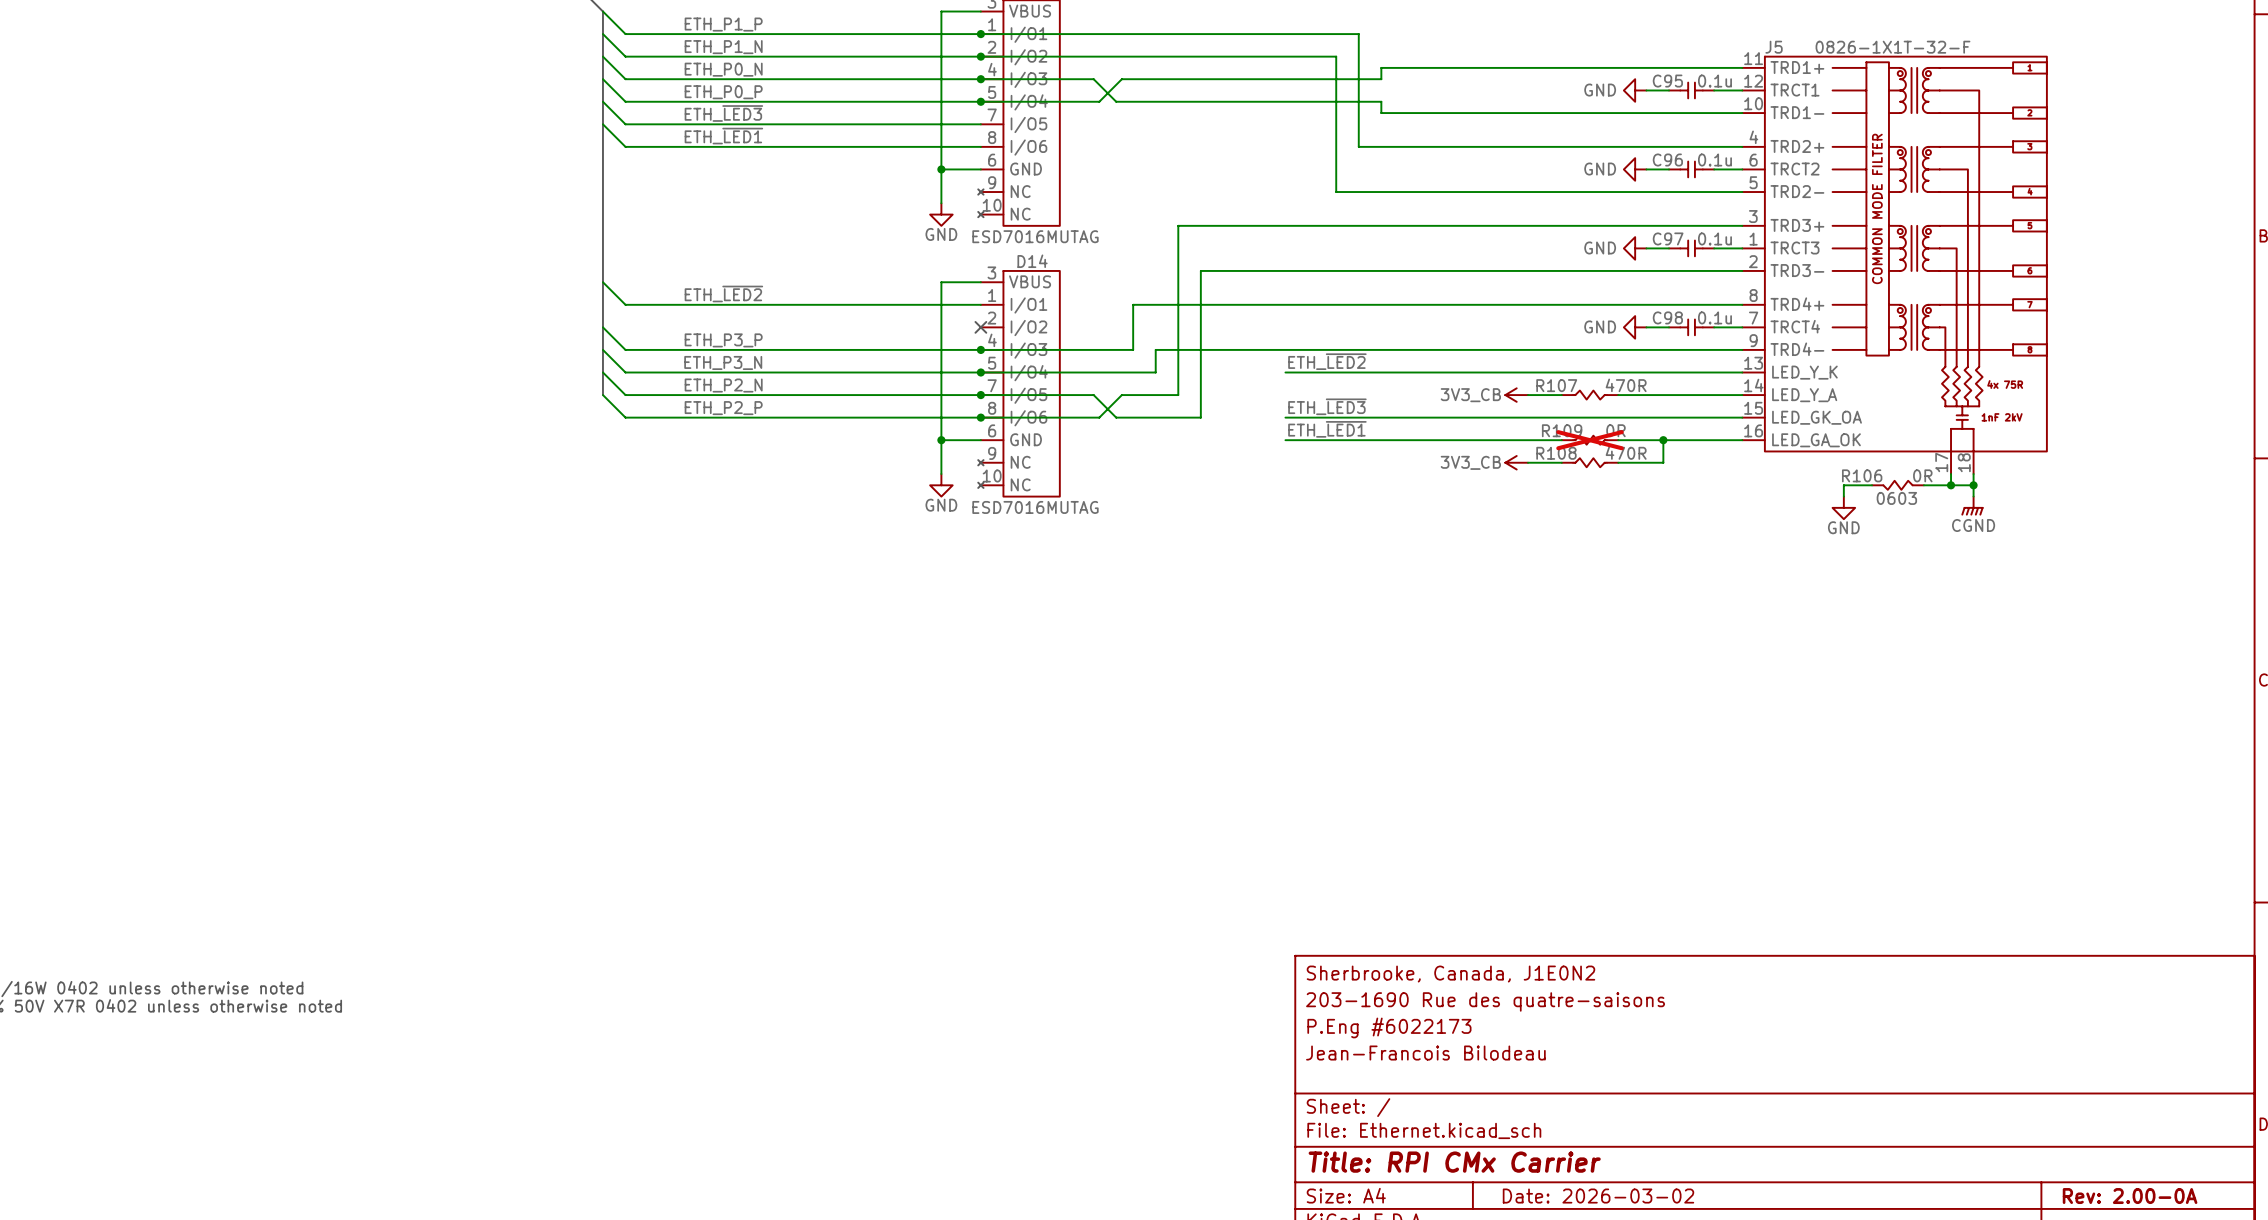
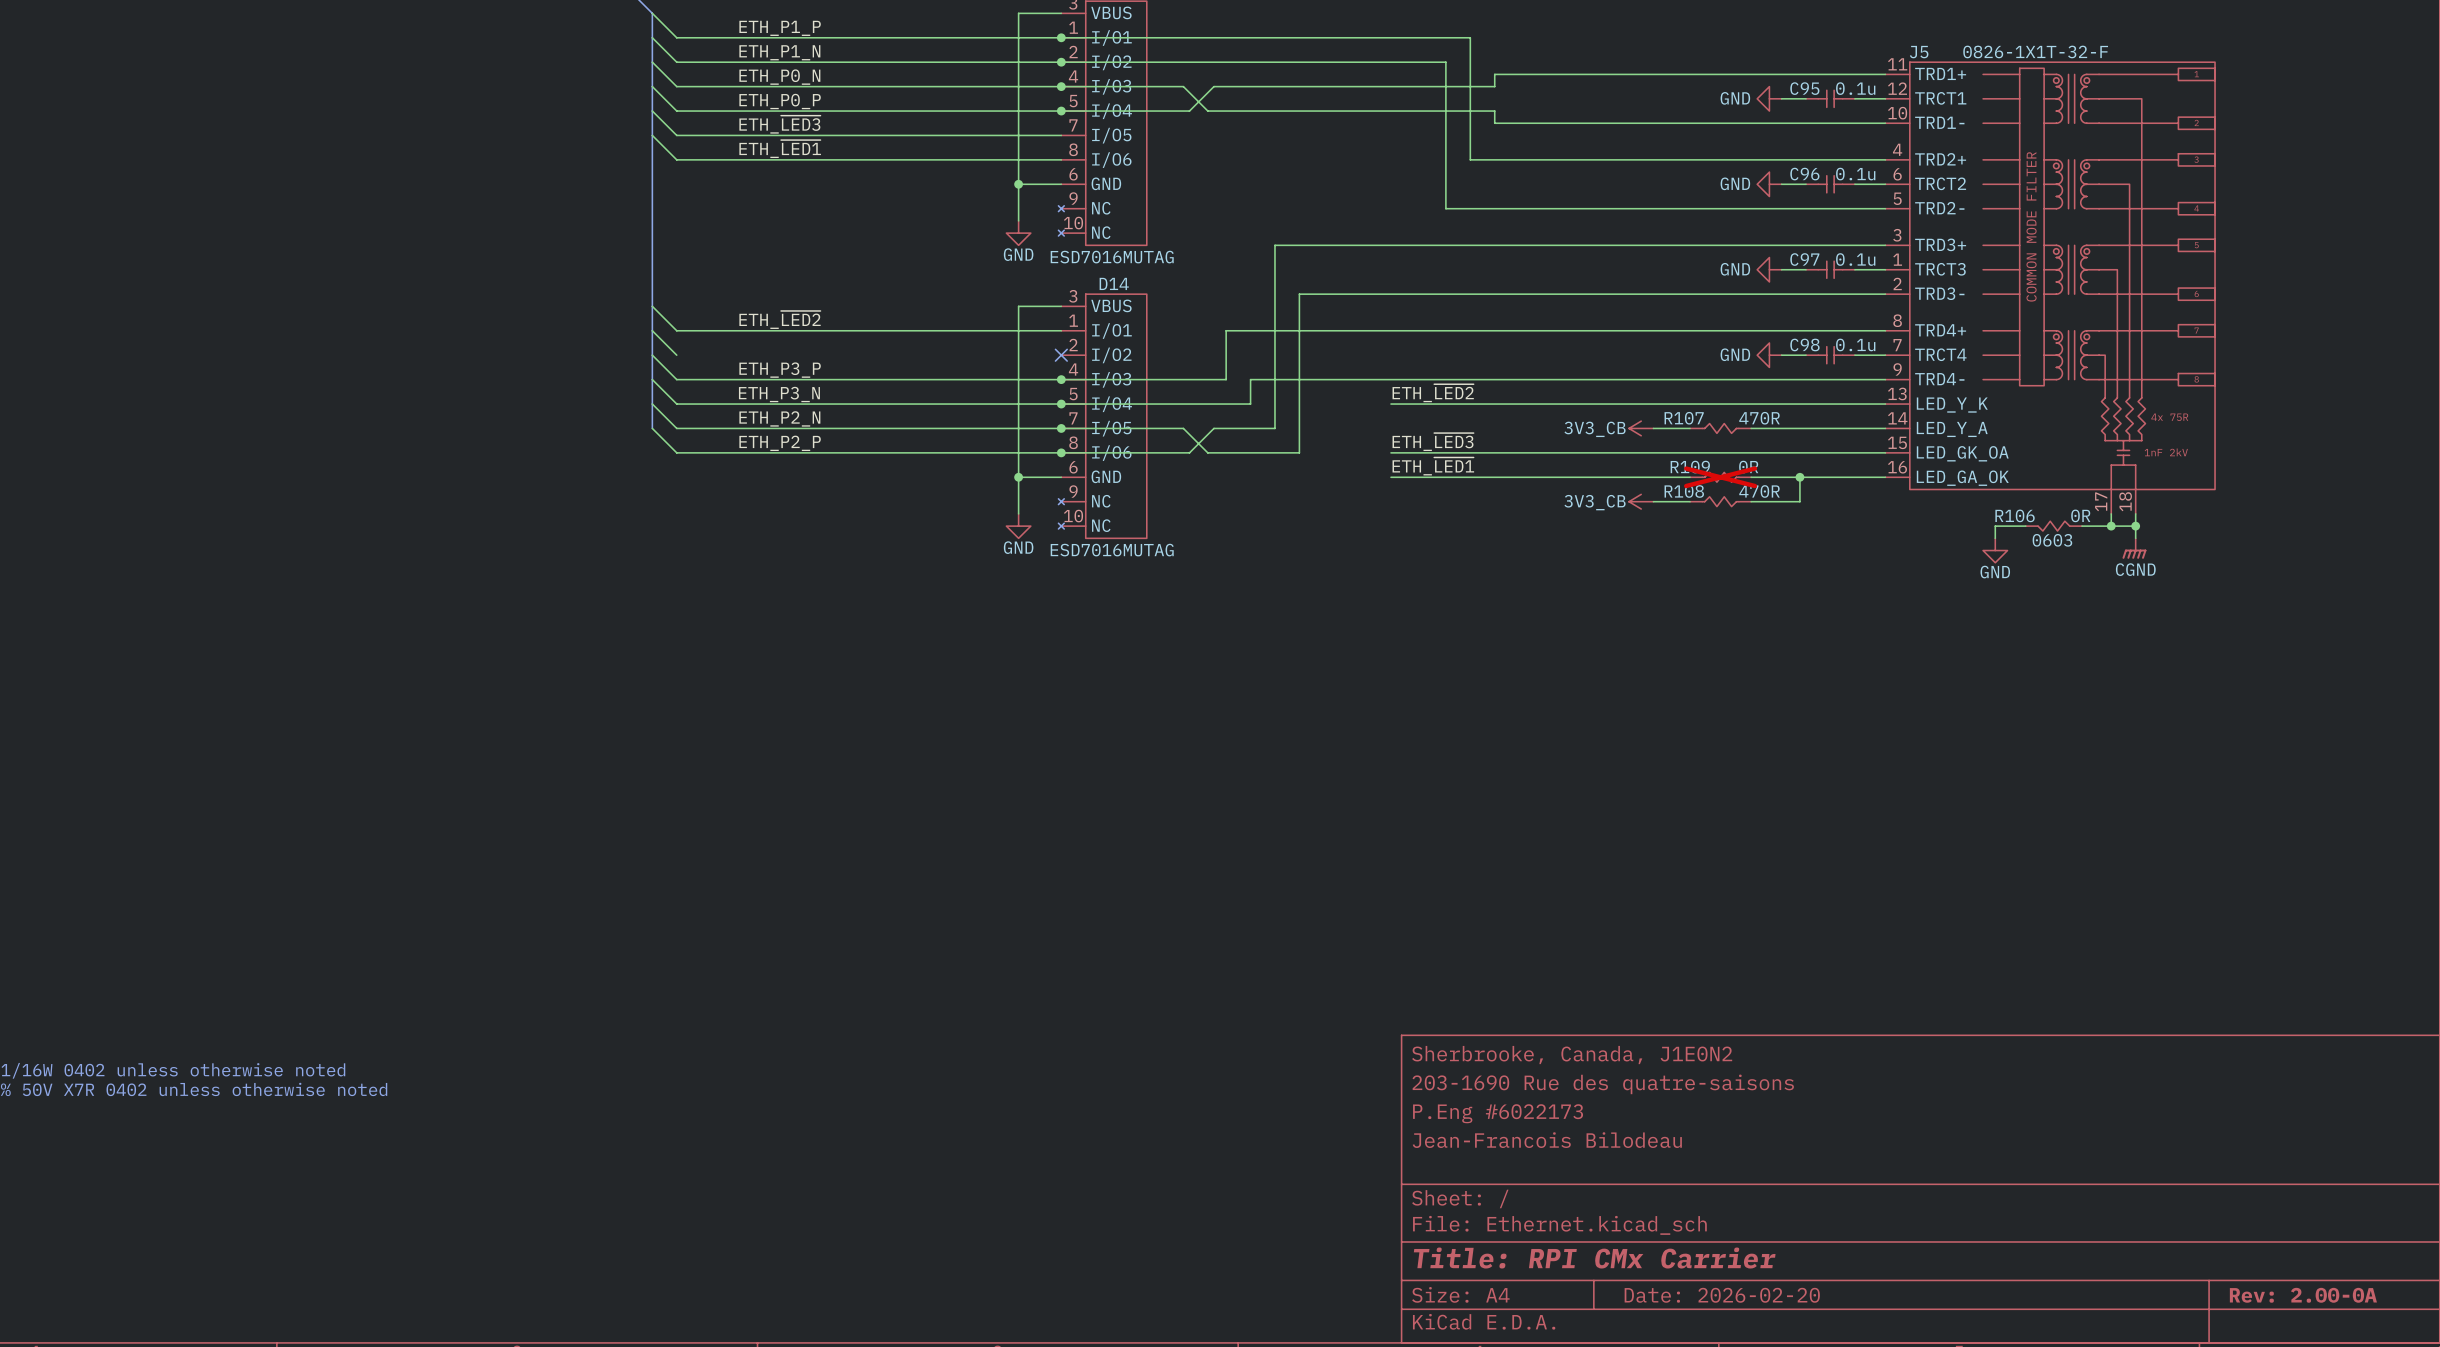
wire: none -> (652, 330) (676, 355)
title block: Date: 2026-03-02 (1598, 1196) -> Date: 2026-02-20 (1722, 1295)

